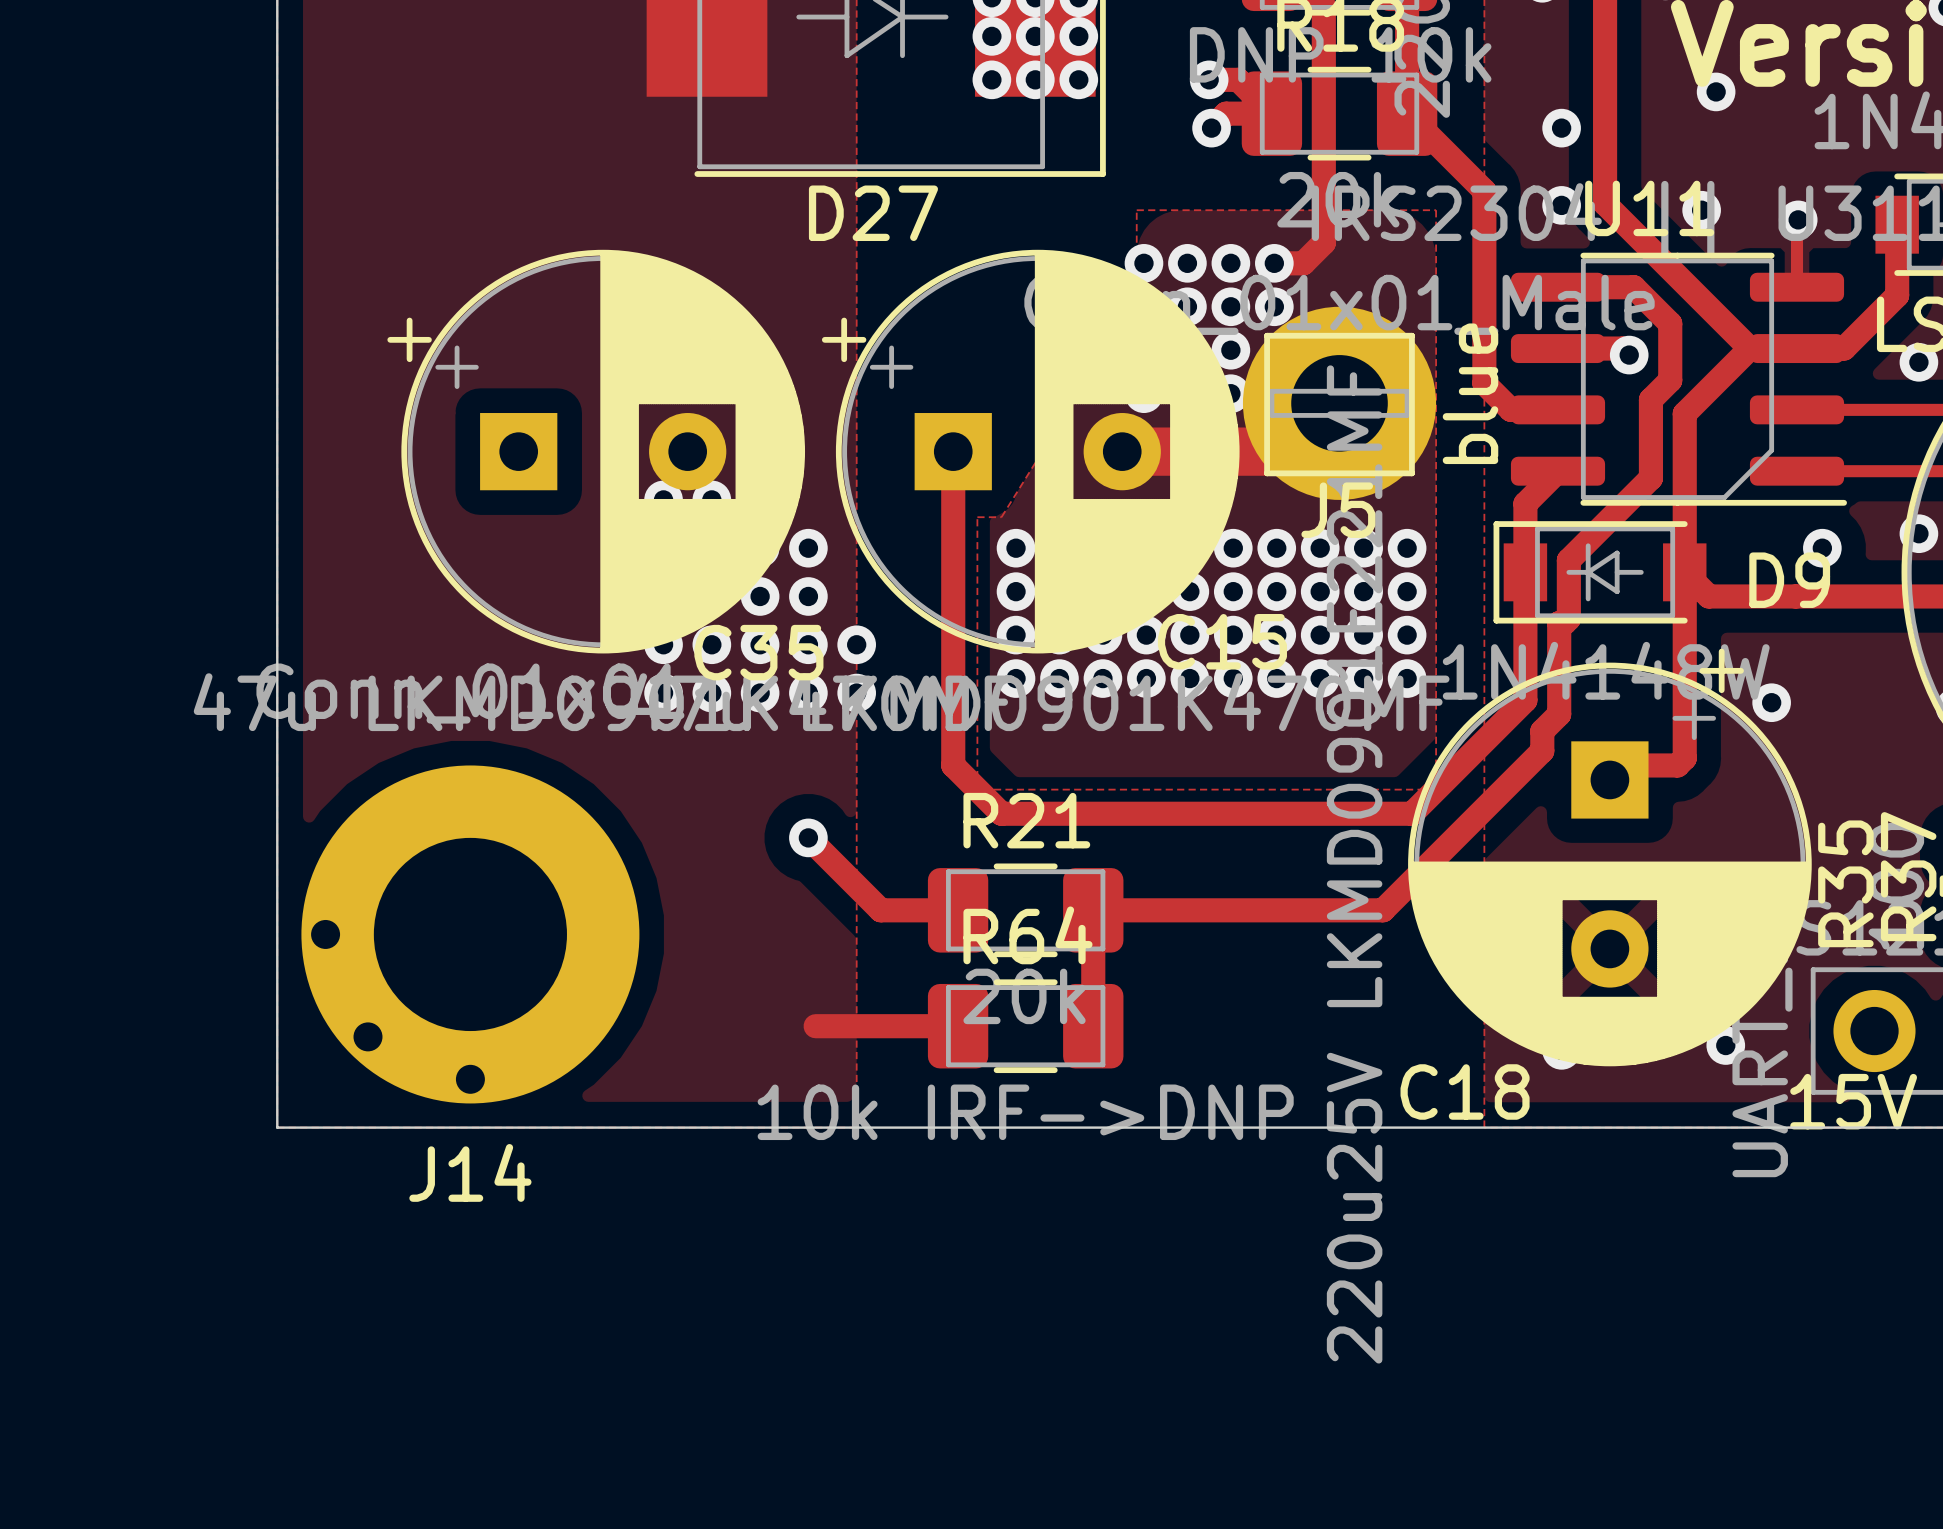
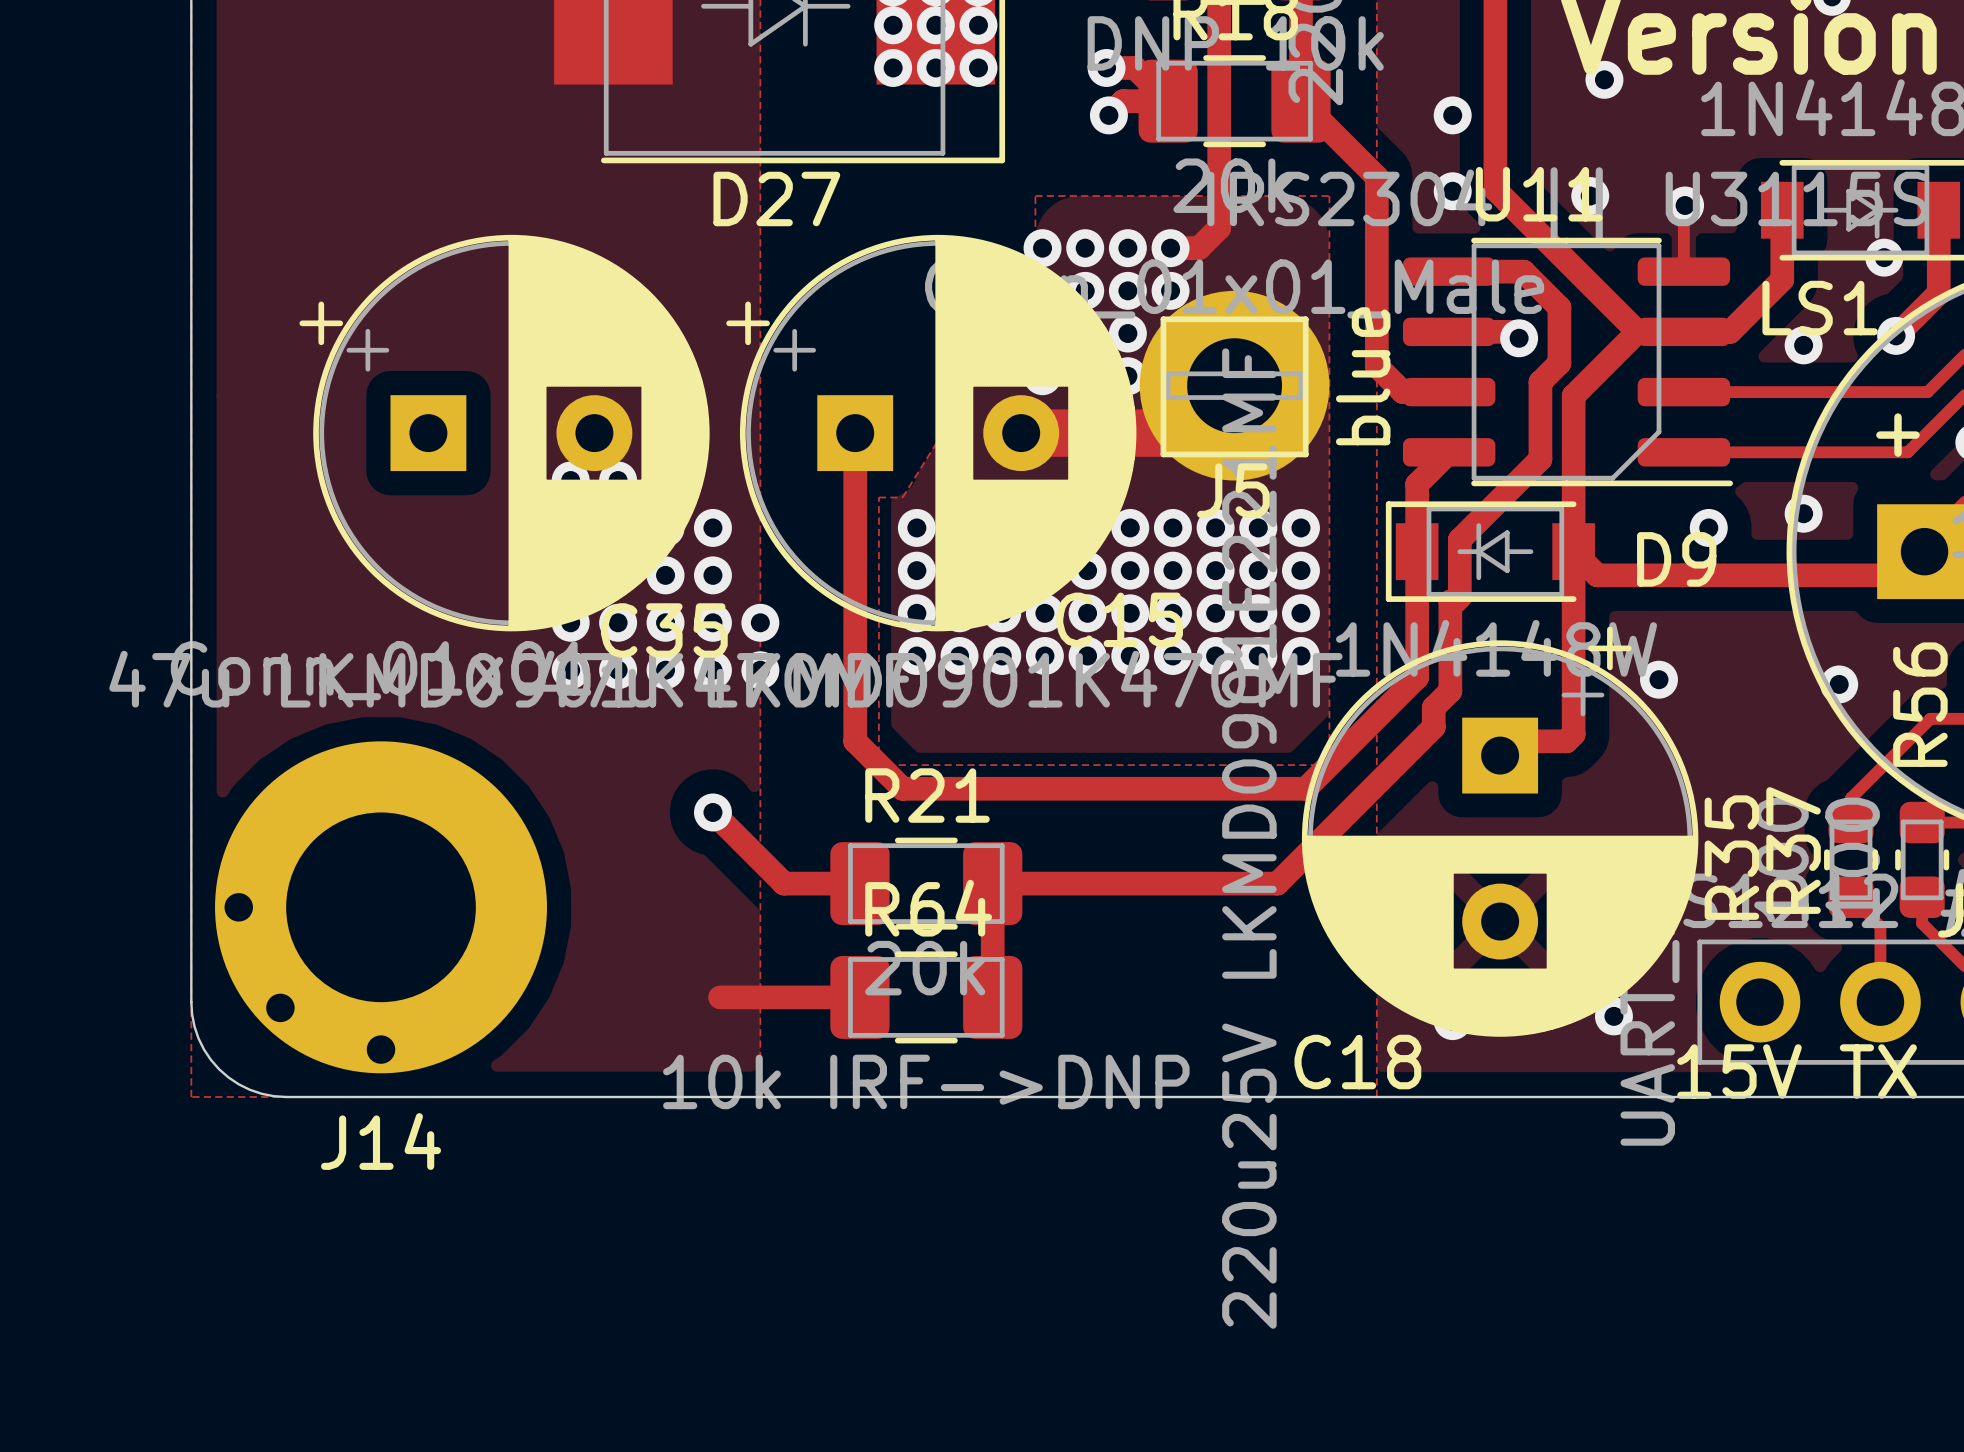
board edge: (277, 1031) (277, 1127) (373, 1127) -> (191, 1002) (194, 1026) (198, 1038) (210, 1059) (219, 1069) (238, 1084) (249, 1089) (261, 1093) (286, 1097)

